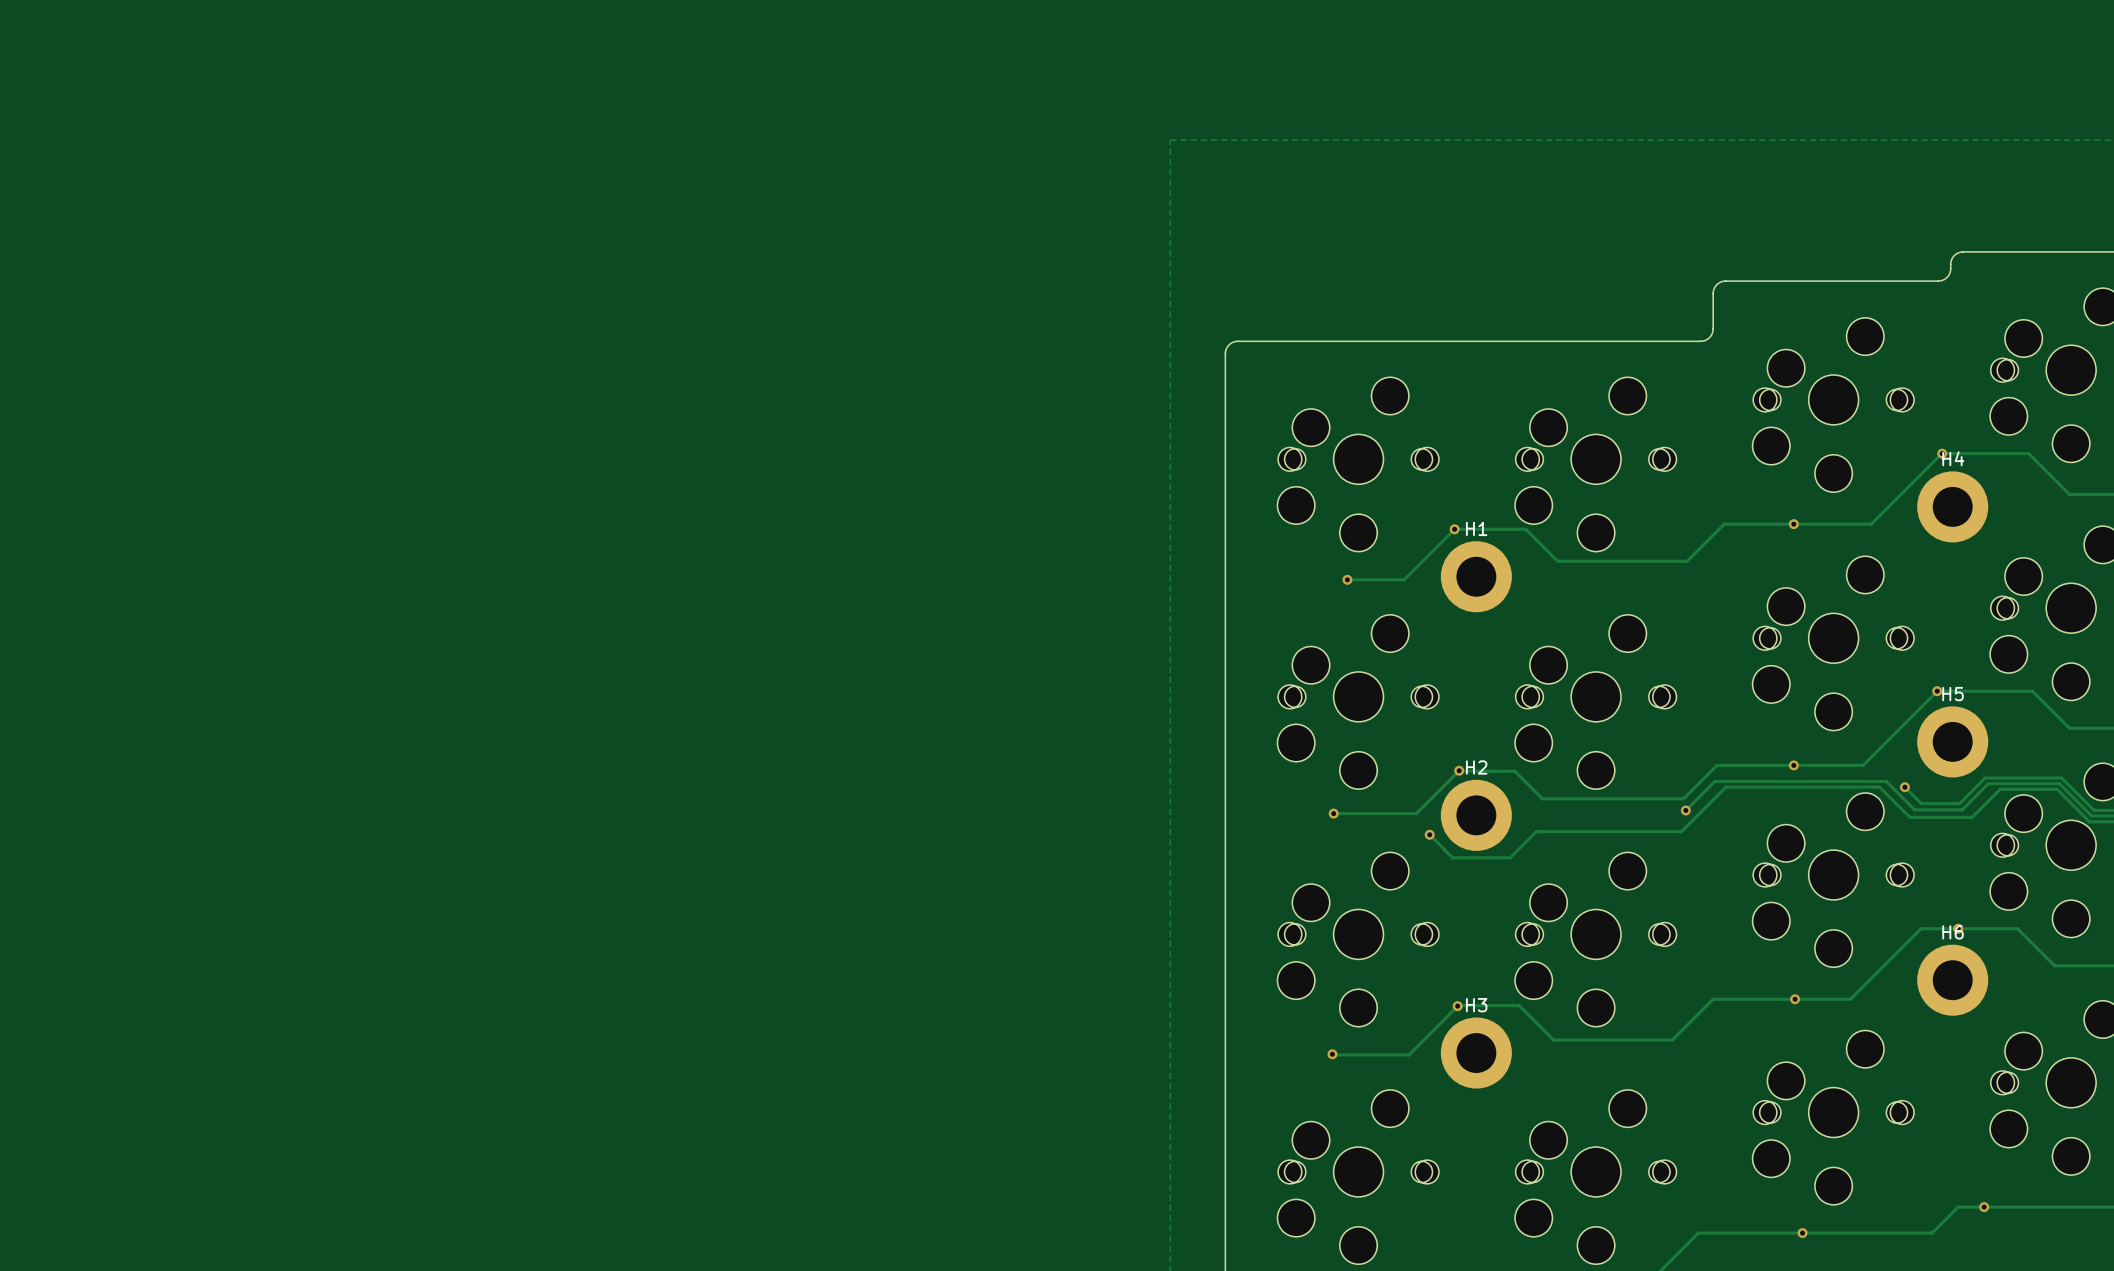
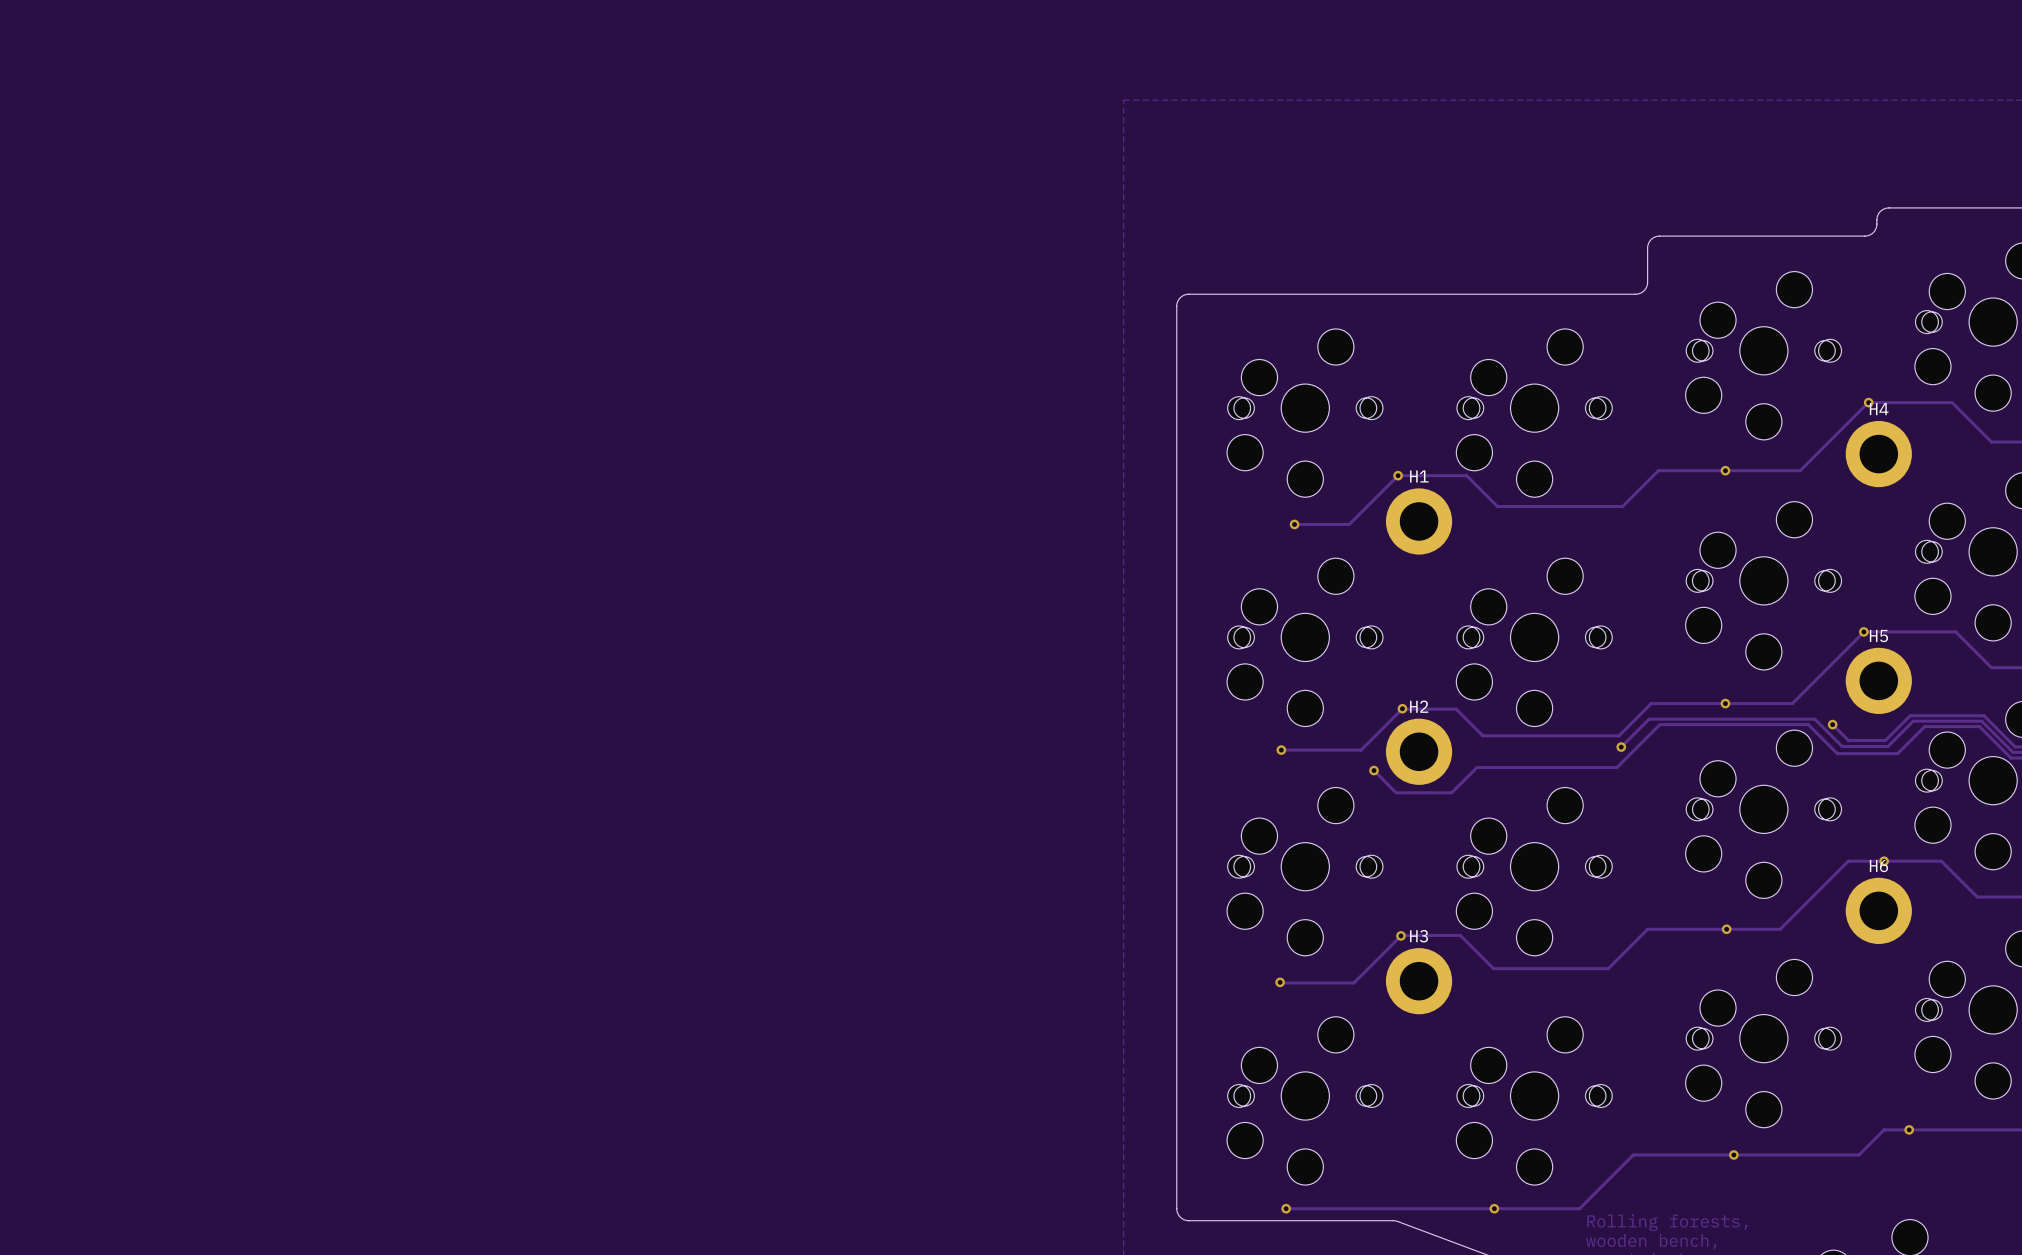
H4 footprint: [1917, 471, 1989, 543] -> [1845, 420, 1912, 488]
H1 footprint: [1440, 541, 1512, 613] -> [1385, 488, 1453, 555]
H5 footprint: [1917, 706, 1989, 778] -> [1845, 647, 1912, 714]
H2 footprint: [1440, 779, 1512, 851] -> [1385, 718, 1453, 785]
H6 footprint: [1917, 944, 1989, 1016] -> [1845, 877, 1912, 944]
H3 footprint: [1440, 1017, 1512, 1089] -> [1385, 948, 1453, 1015]

